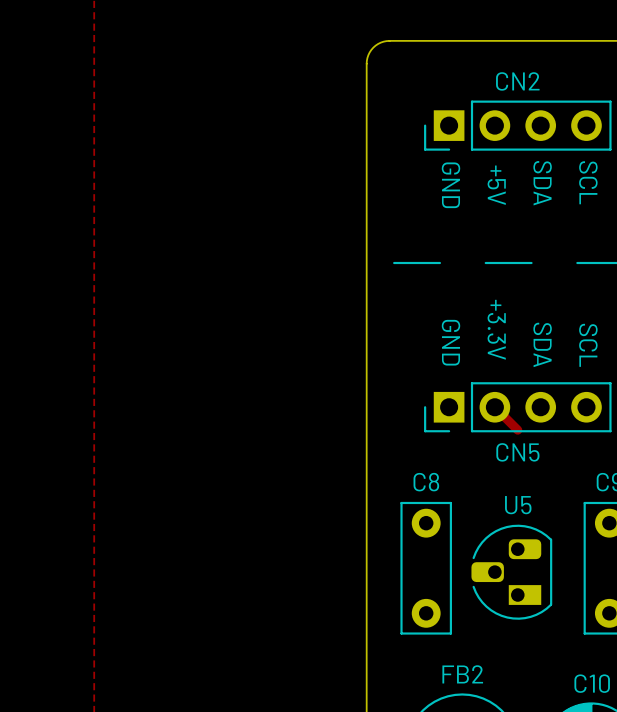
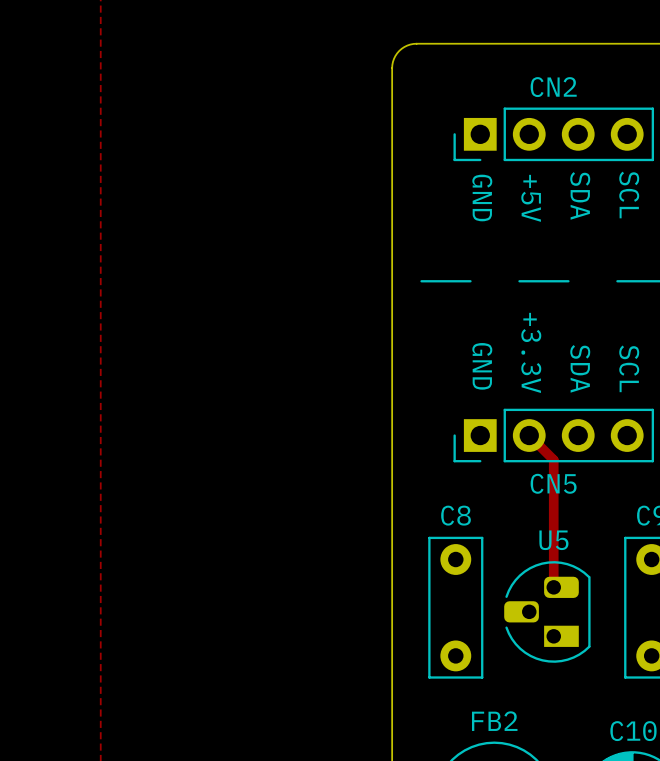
track: none -> (553, 460) (553, 587)

